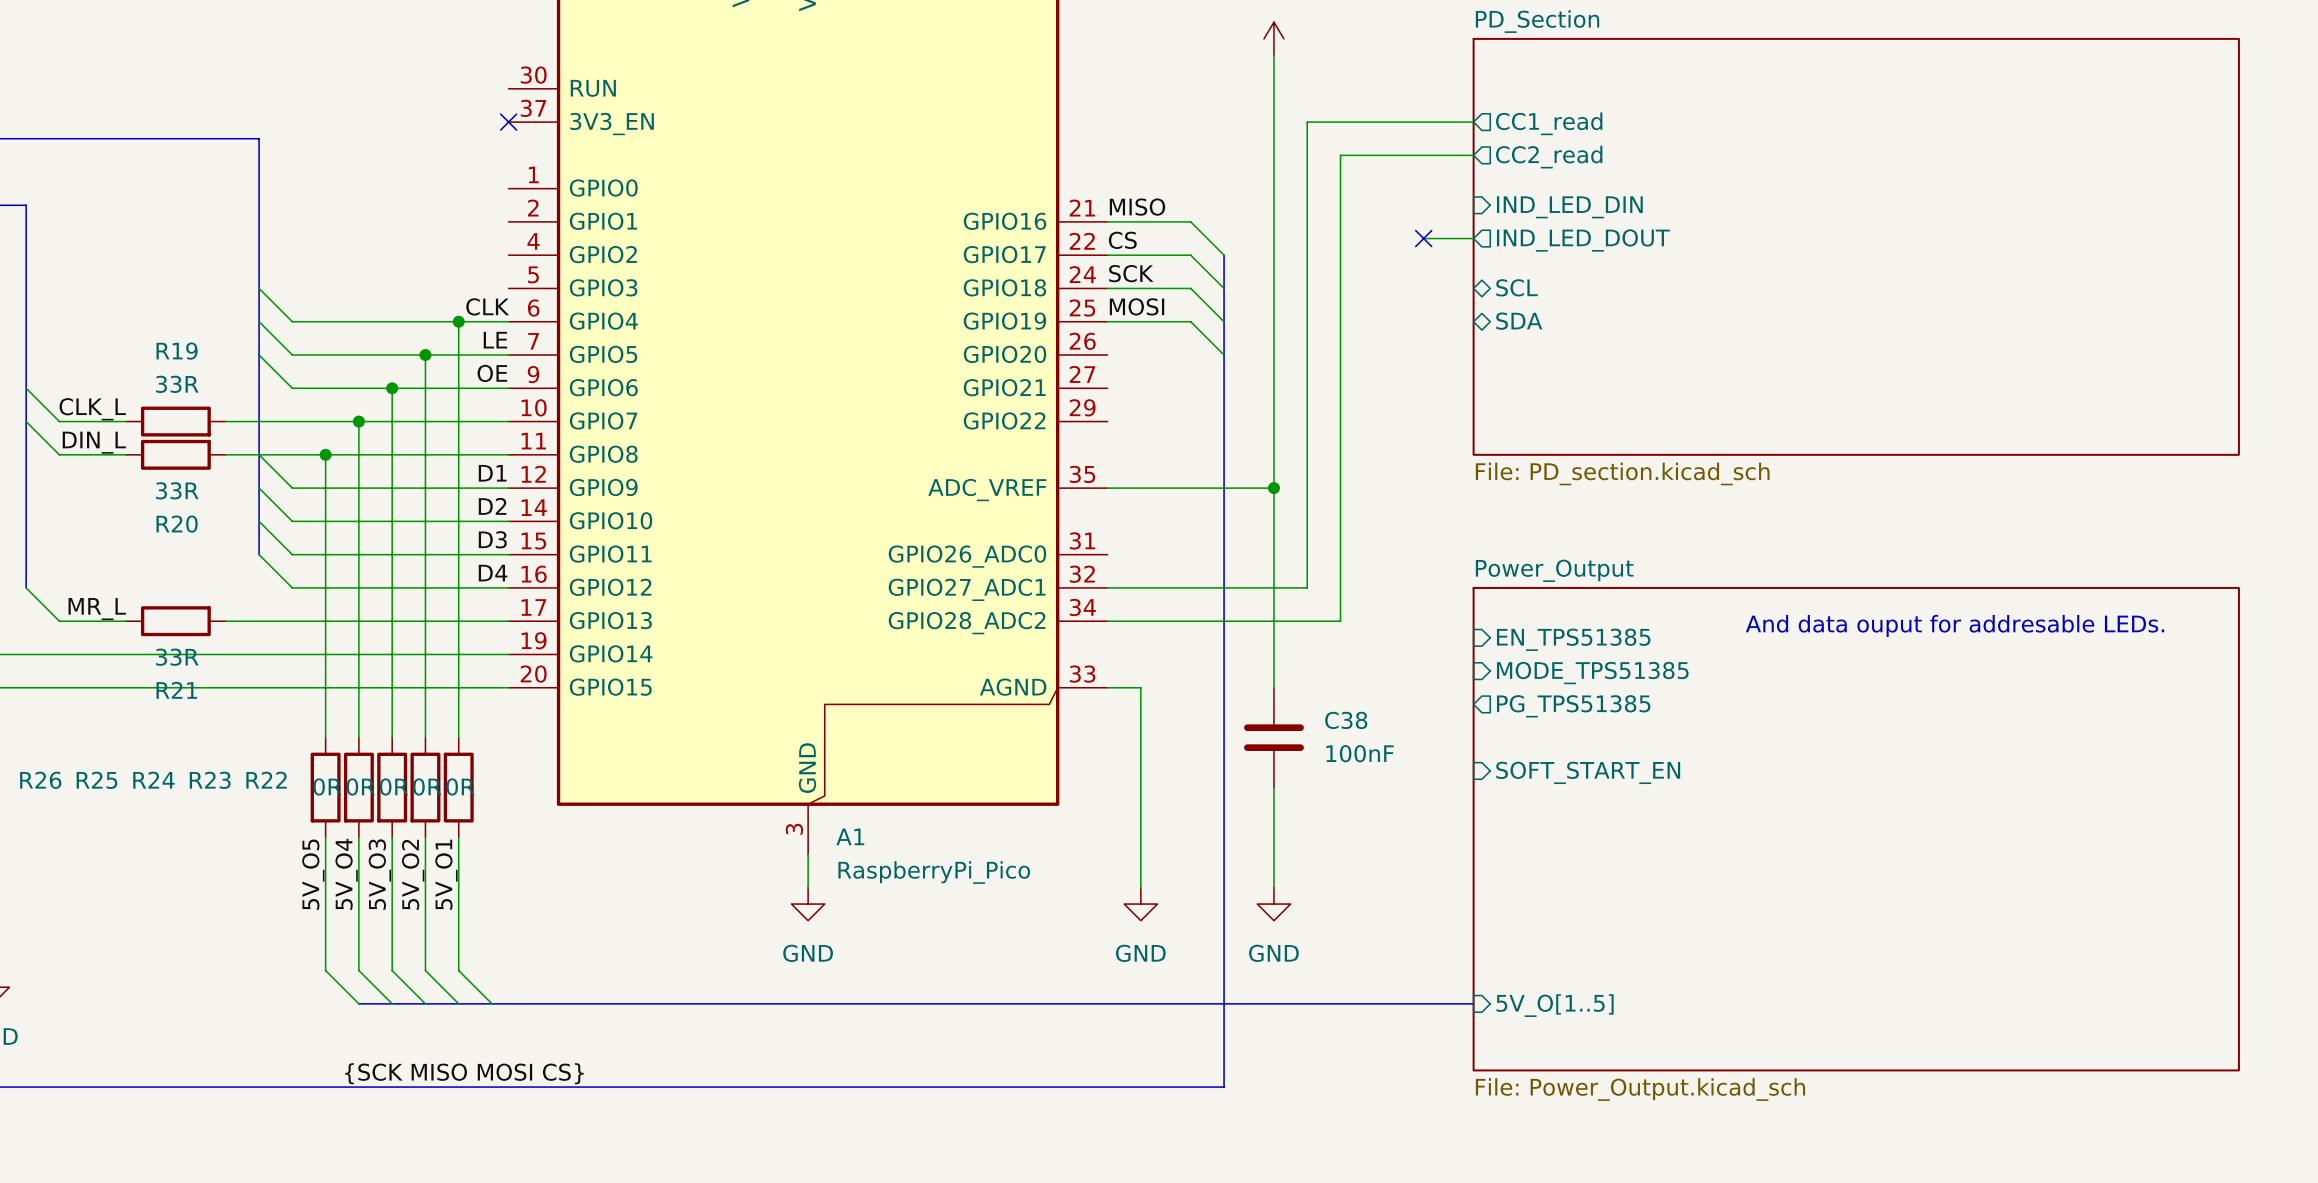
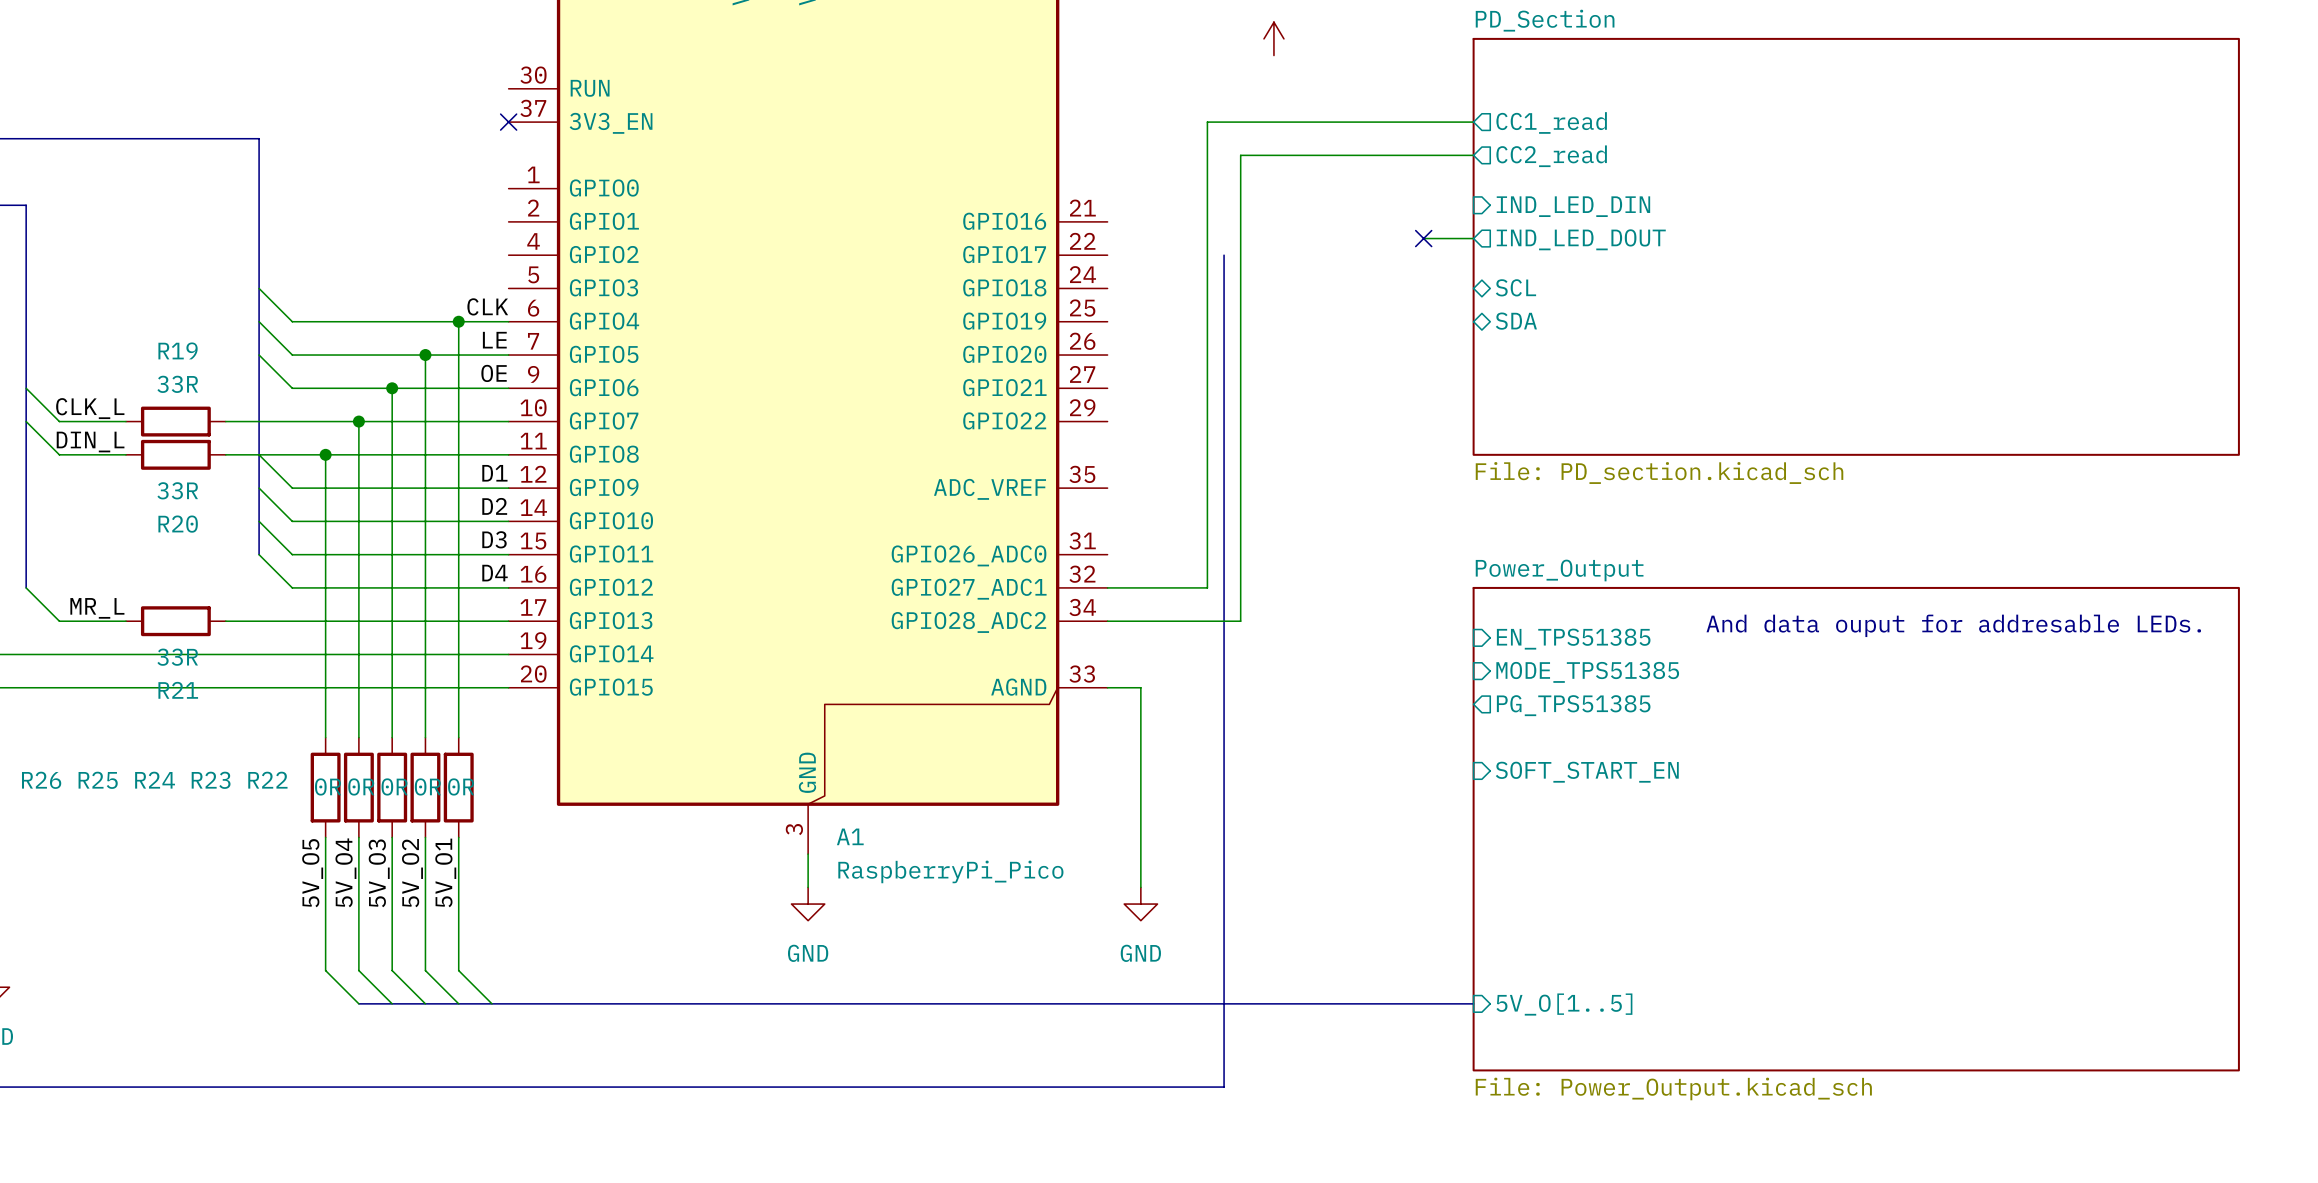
wire: (1273, 55) (1273, 687) -> none
wire: (1307, 122) (1307, 587) (1207, 587) -> (1307, 122) (1207, 122) (1207, 587)
wire: (1340, 155) (1340, 621) (1240, 621) -> (1340, 155) (1240, 155) (1240, 621)
label: MISO (1137, 207) -> none
wire: (1107, 221) (1190, 221) (1224, 255) -> none
label: CS (1122, 240) -> none
wire: (1107, 255) (1190, 255) (1224, 288) -> none
label: SCK (1131, 273) -> none
wire: (1107, 288) (1190, 288) (1224, 321) -> none
label: MOSI (1137, 306) -> none
wire: (1107, 321) (1190, 321) (1224, 355) -> none
wire: (1107, 488) (1273, 488) -> none
junction: (1273, 488) -> none
C38: 100nF (1273, 737) -> none
wire: (1273, 787) (1273, 887) -> none
power symbol: GND (1273, 904) -> none
label: {SCK MISO MOSI CS} (464, 1073) -> none

